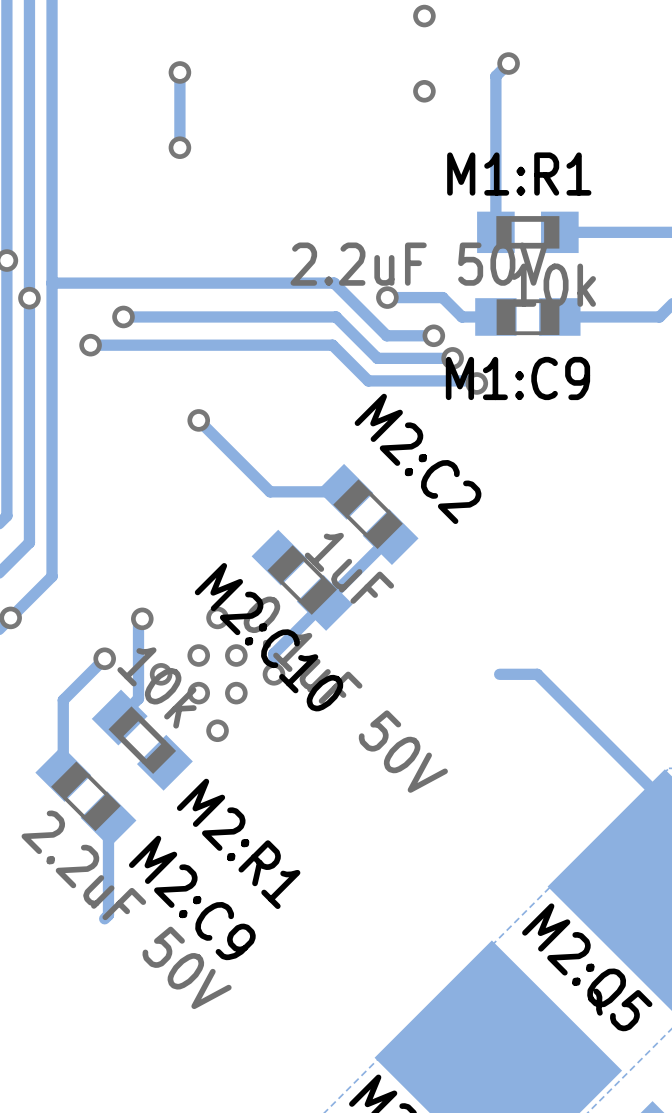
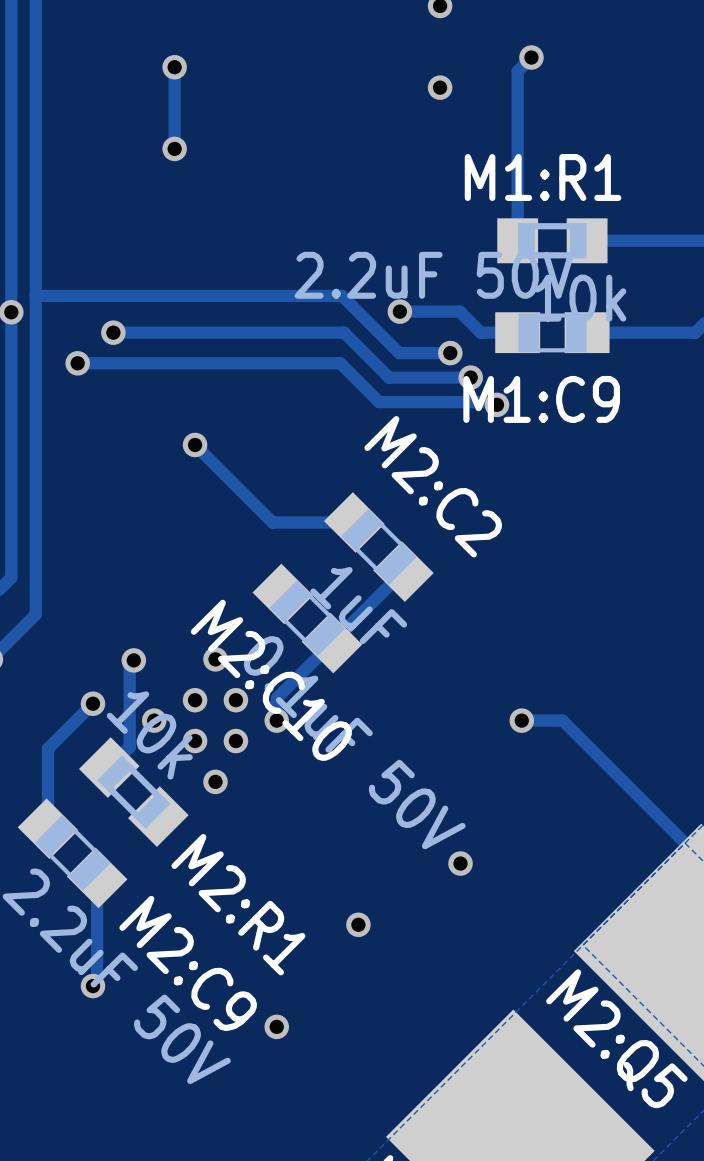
via: none -> (521, 720)
via: none -> (460, 863)
via: none -> (358, 924)
via: none -> (92, 986)
via: none -> (276, 1026)

